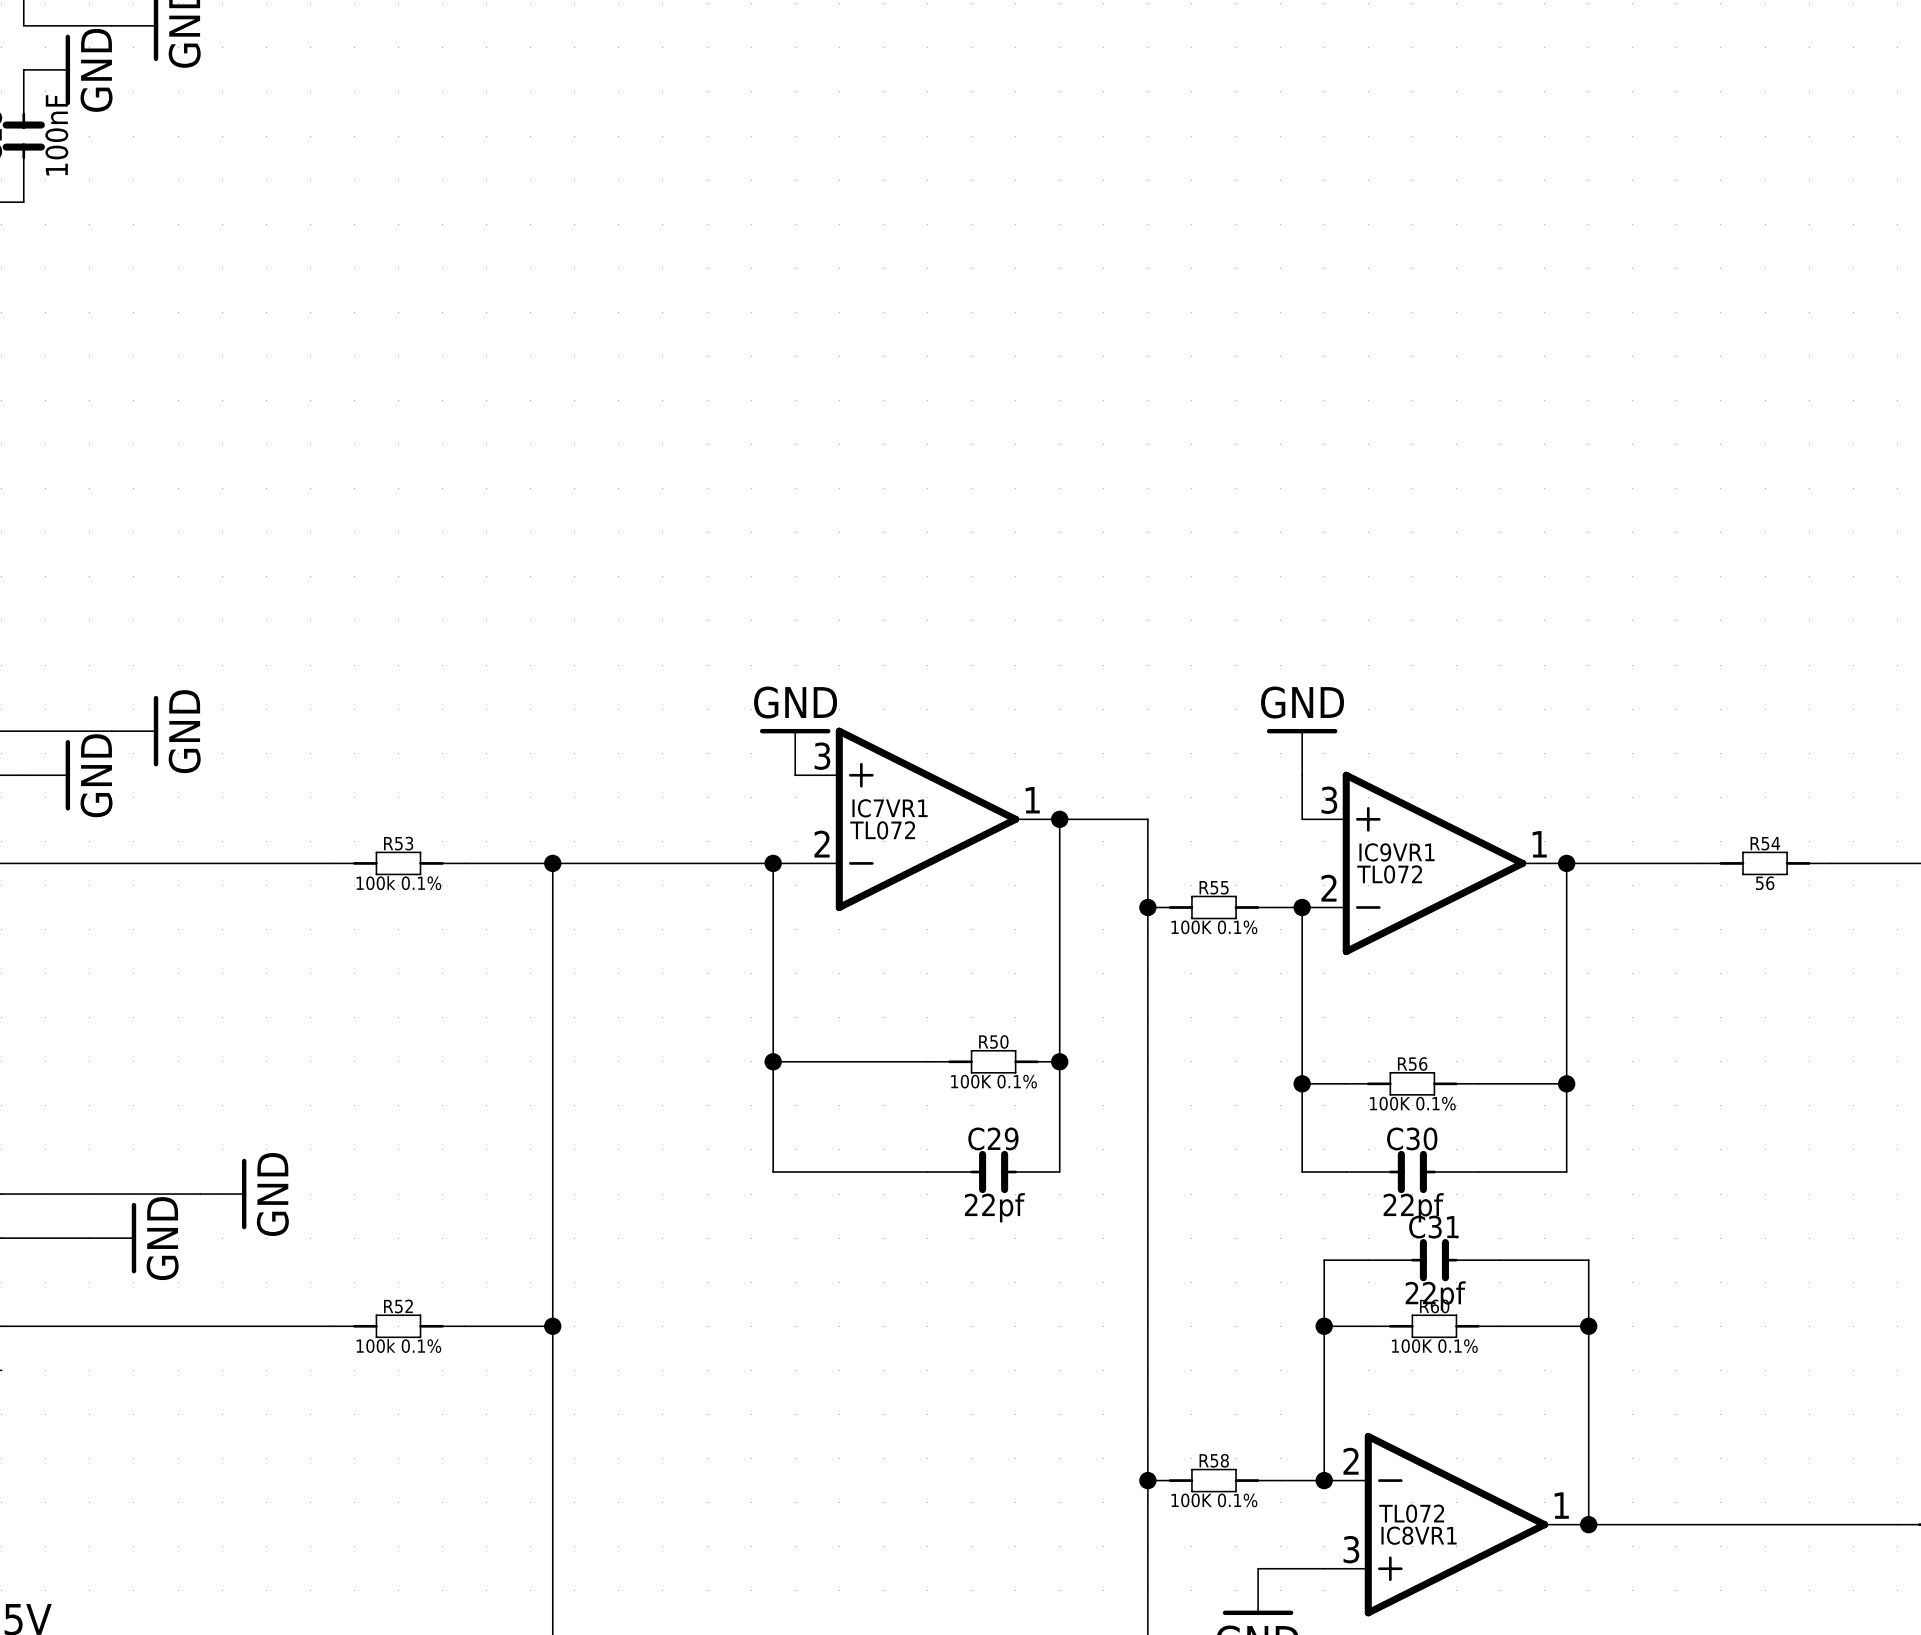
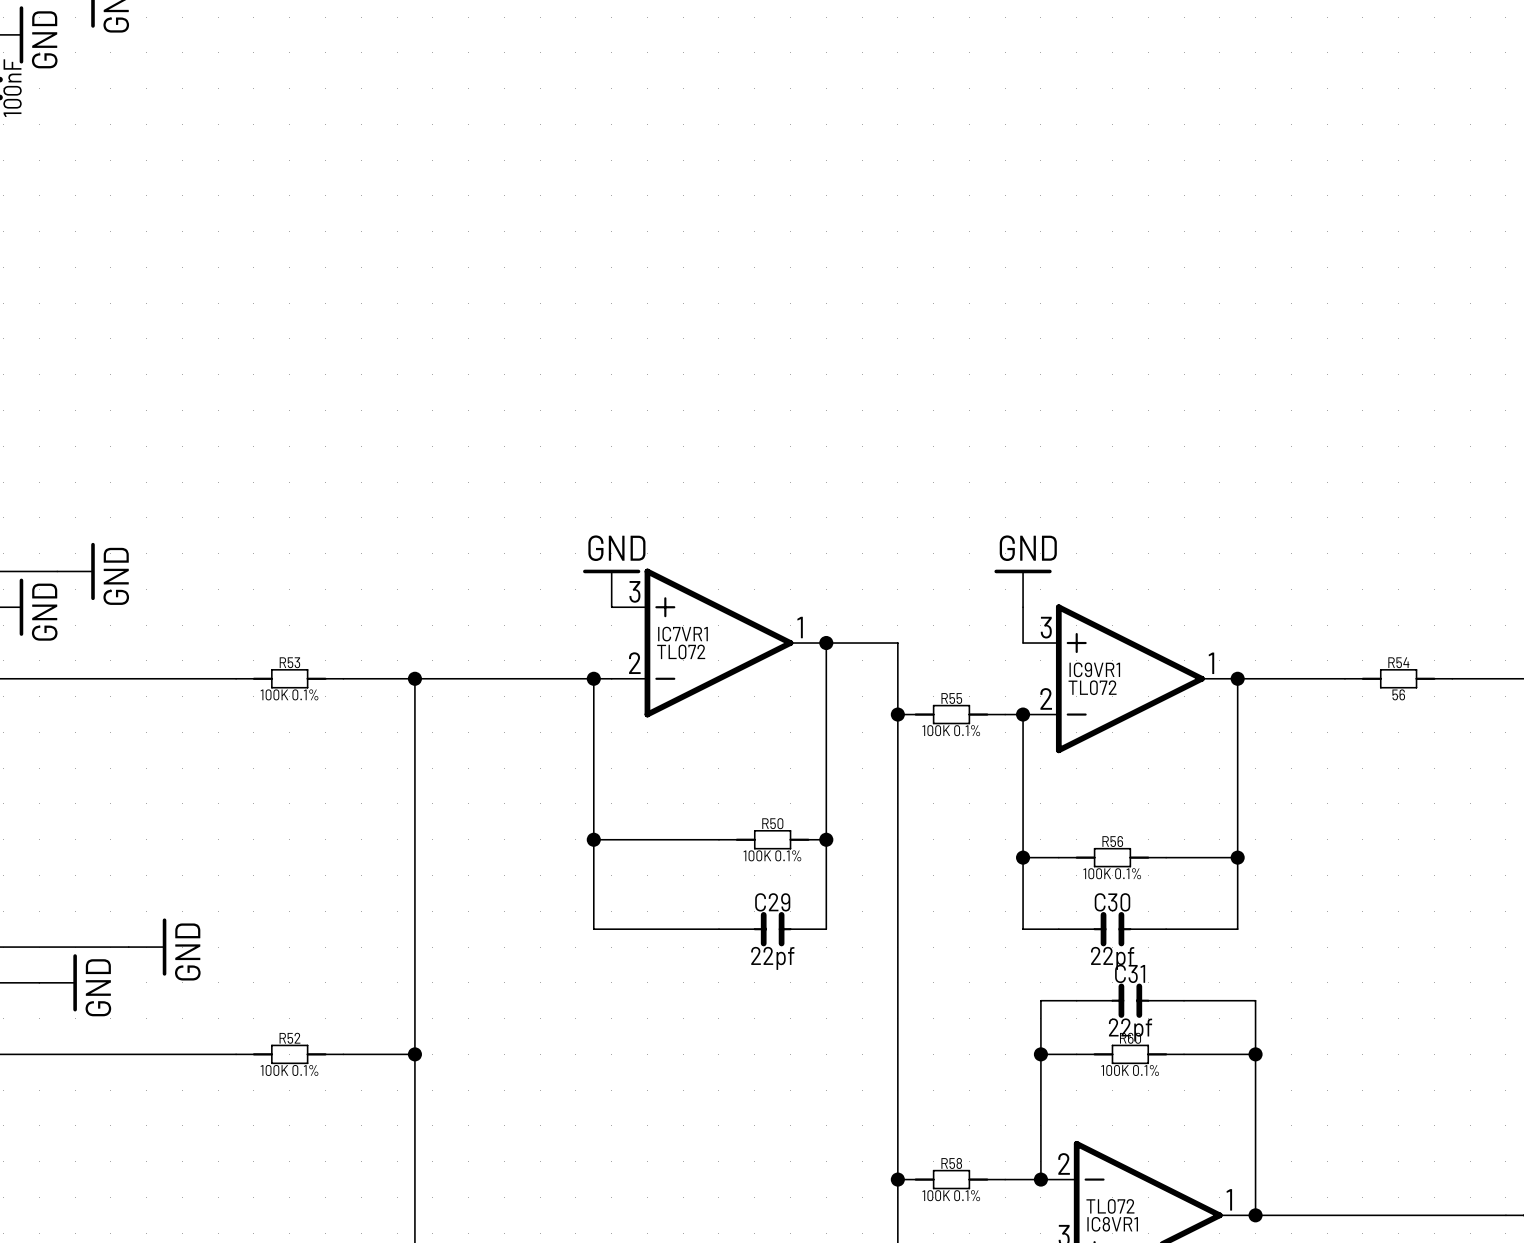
R53 value: 100k 0.1% (398, 883) -> 100K 0.1% (289, 694)
R52 value: 100k 0.1% (398, 1345) -> 100K 0.1% (289, 1070)

